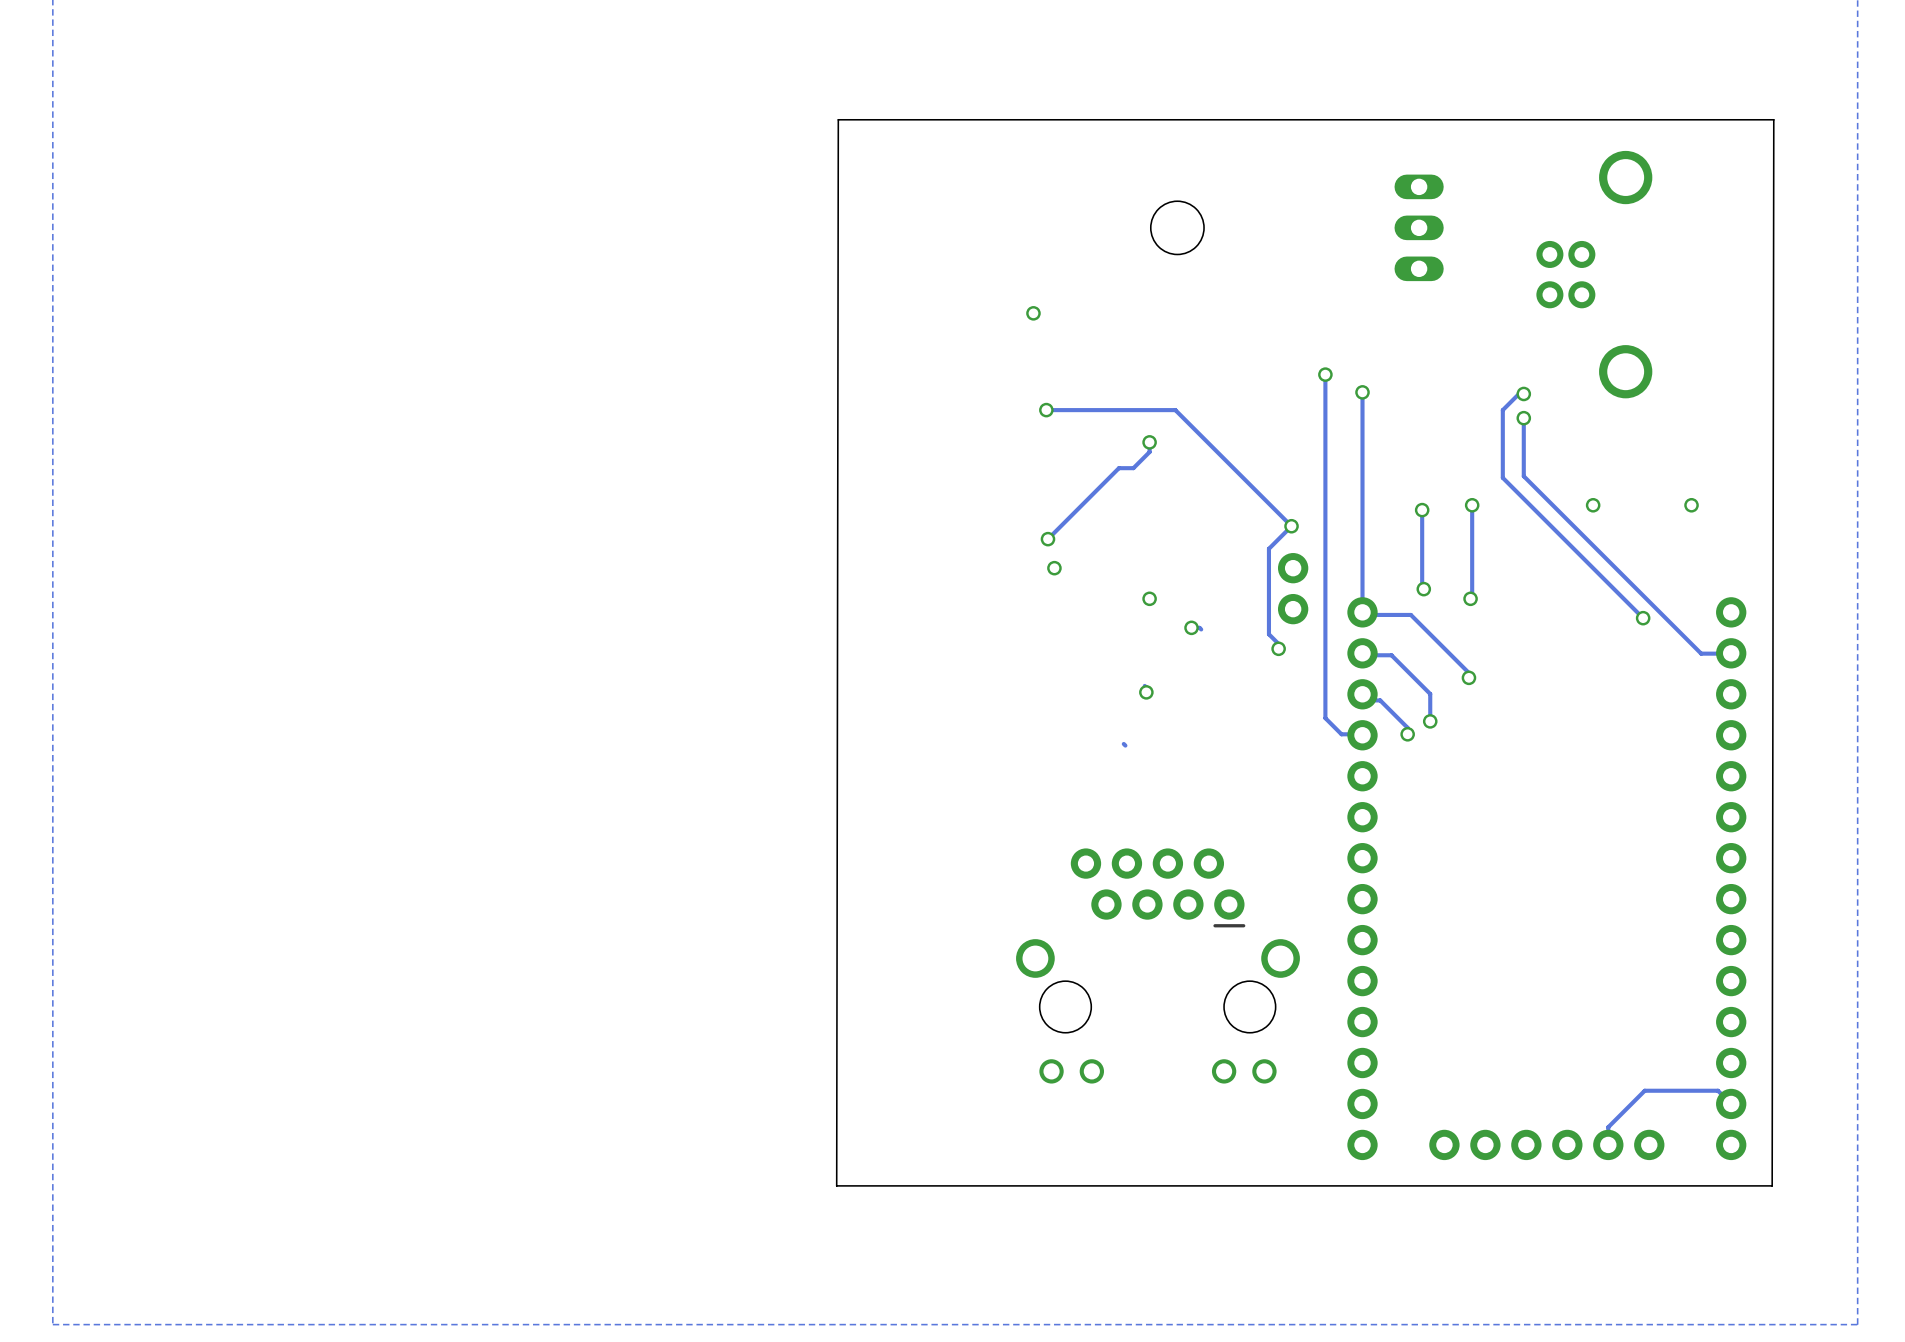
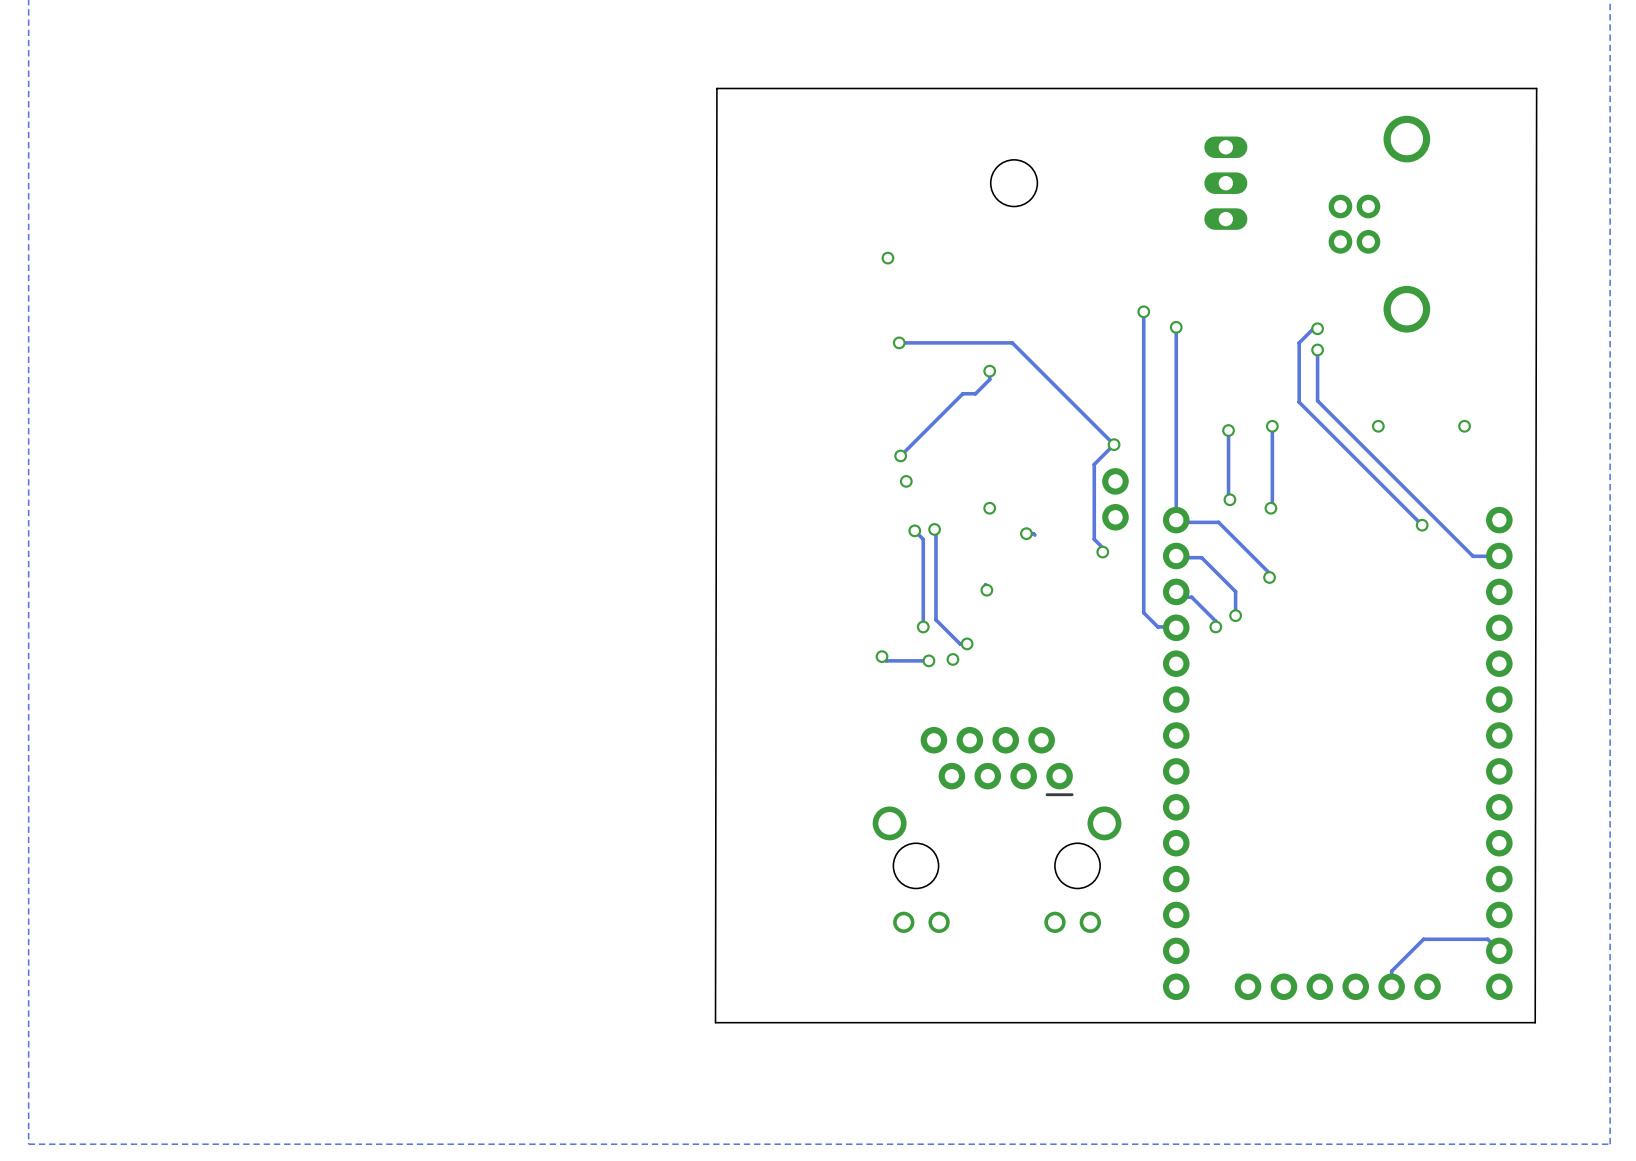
track: none -> (934, 529) (935, 619) (960, 643) (967, 643)
via: none -> (934, 529)
track: none -> (914, 530) (923, 539) (923, 626)
via: none -> (914, 530)
via: none -> (923, 626)
track: (1123, 743) (1125, 745) -> none
via: none -> (967, 643)
track: none -> (881, 656) (886, 660) (928, 660)
via: none -> (881, 656)
via: none -> (952, 659)
via: none -> (928, 660)

